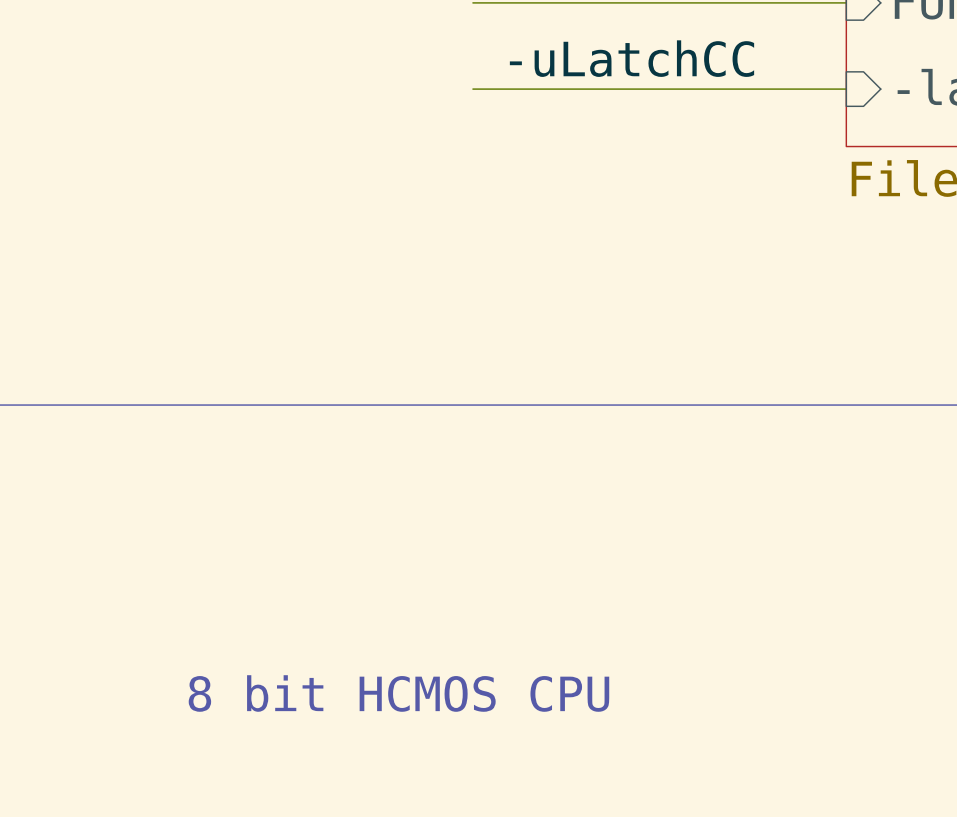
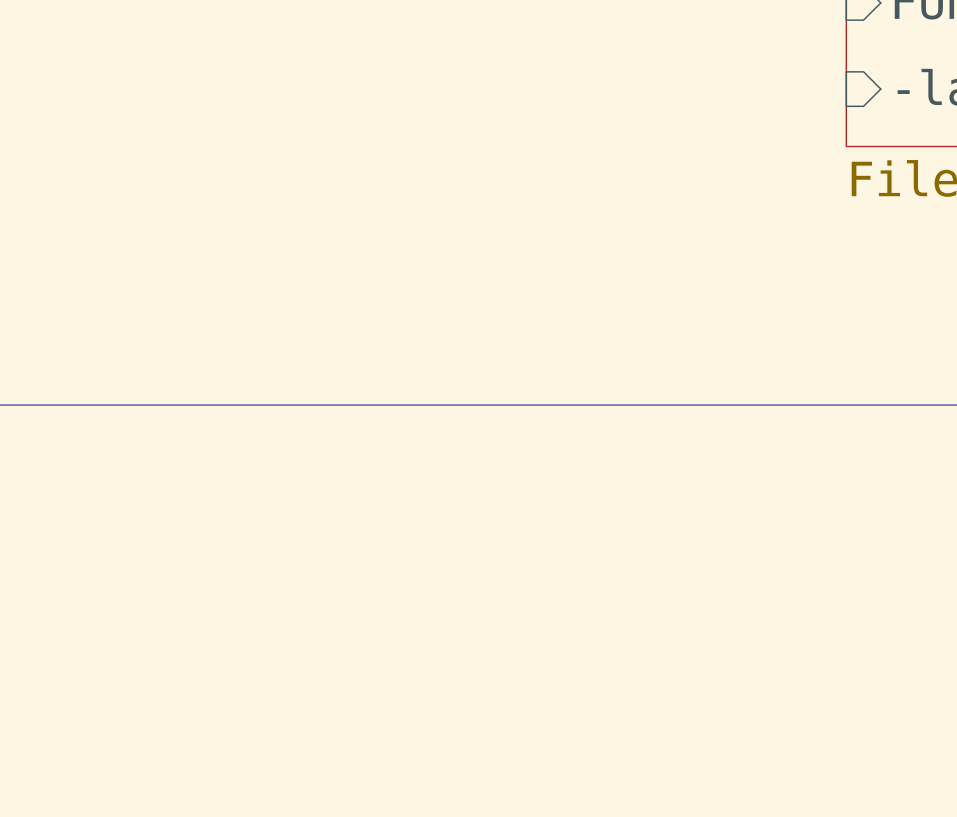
wire: (472, 2) (846, 2) -> none
label: -uLatchCC (631, 58) -> none
wire: (472, 89) (846, 89) -> none
text: 8 bit HCMOS CPU (398, 693) -> none

